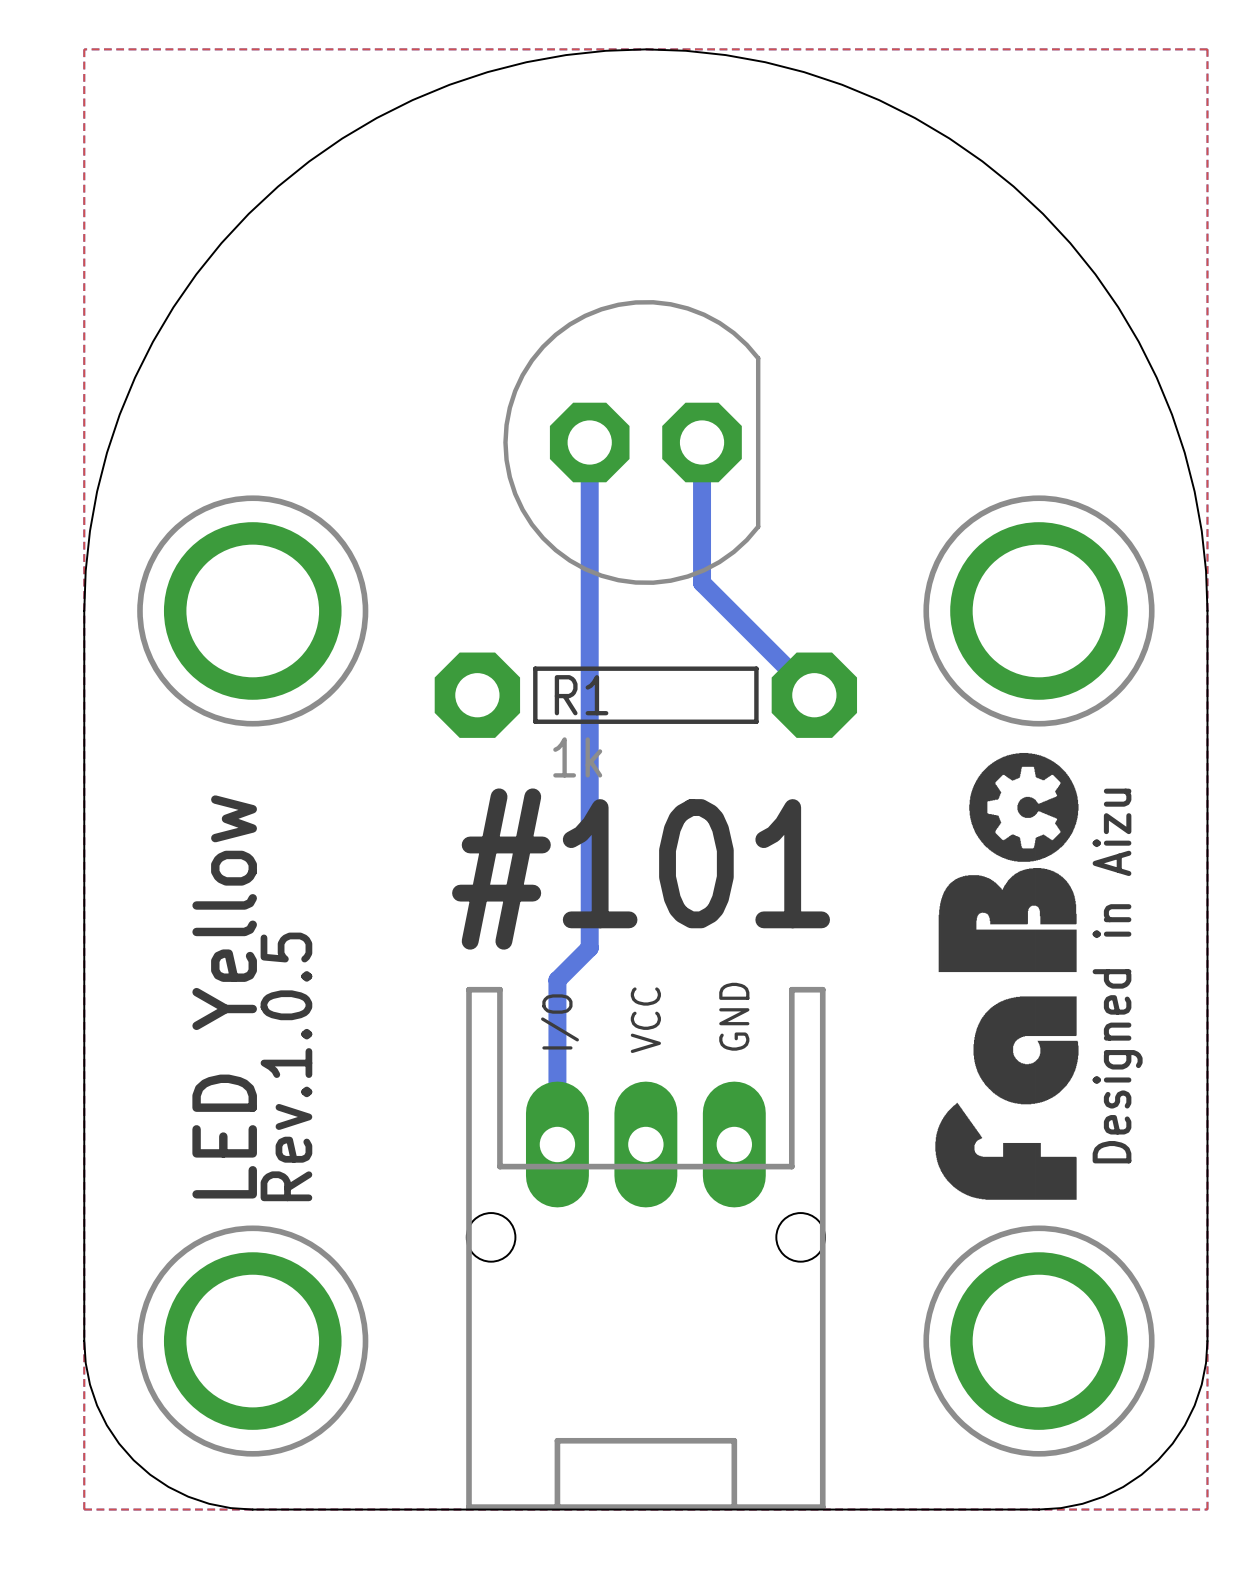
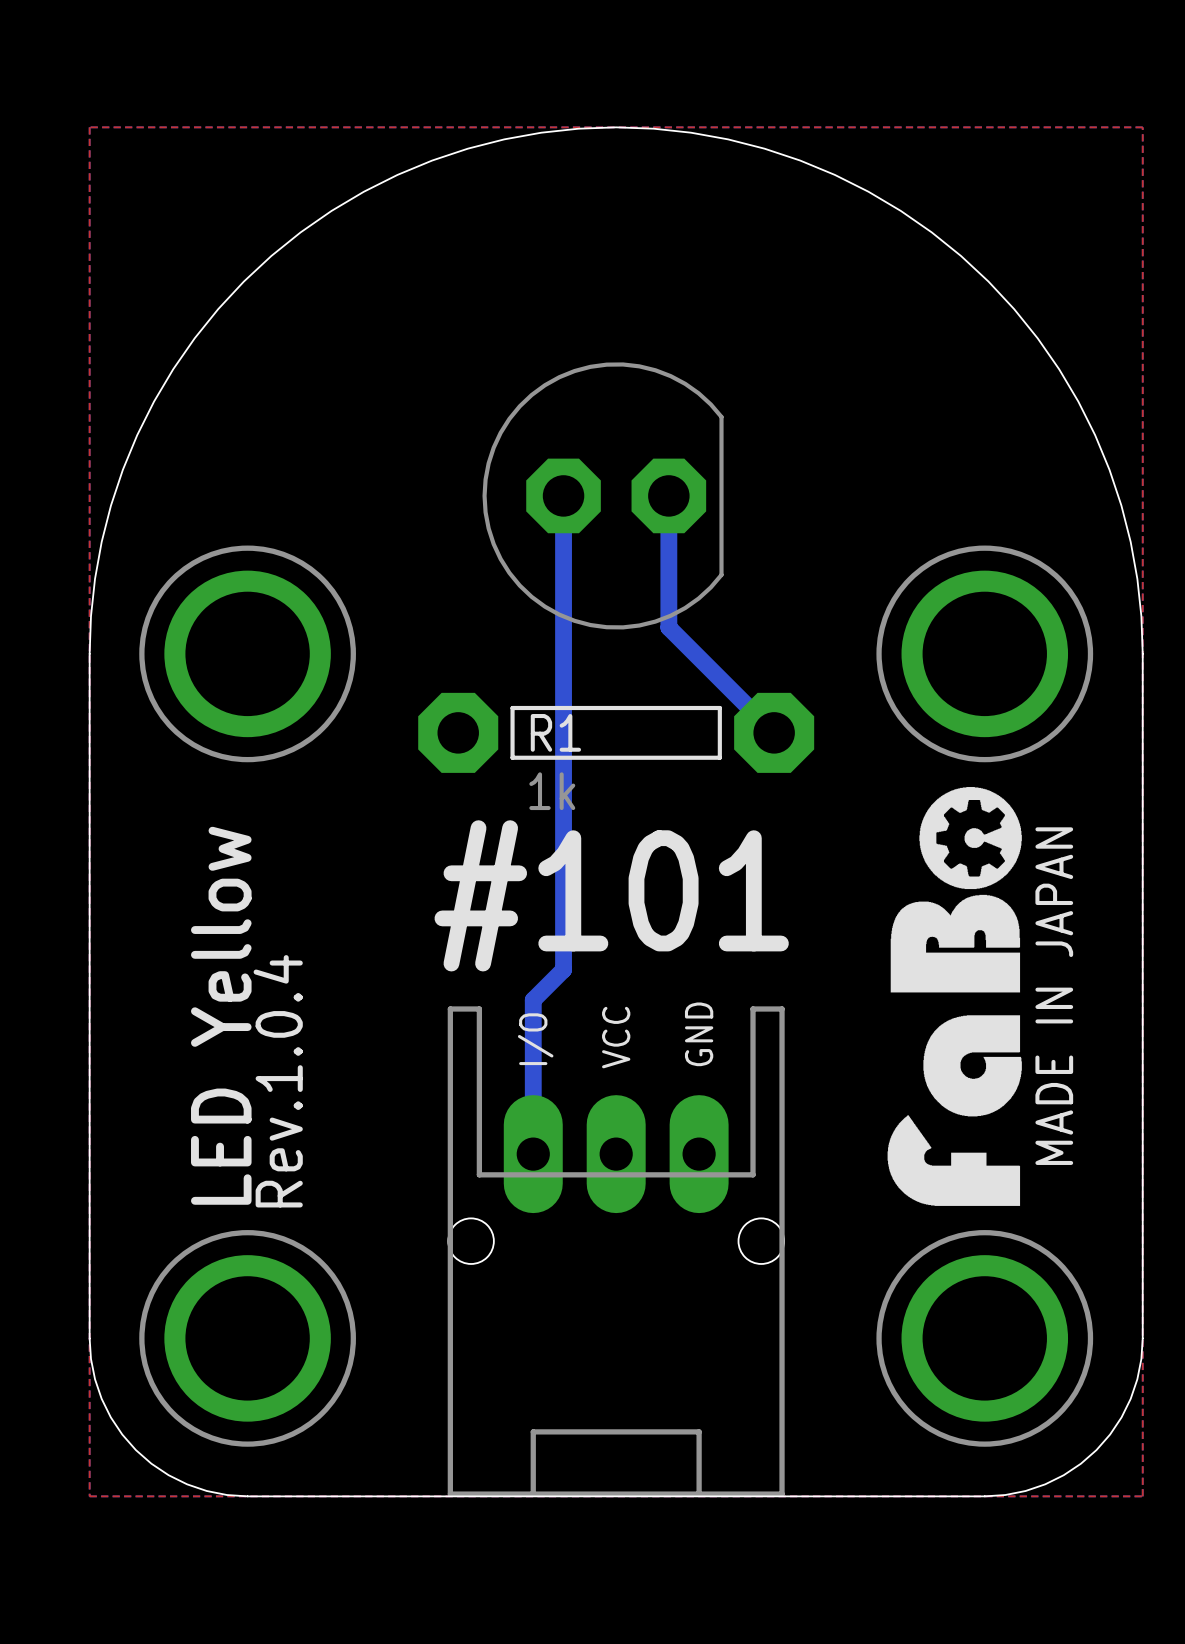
text: Designed in Aizu (1117, 976) -> MADE IN JAPAN (1054, 996)
text: Rev.1.0.5 (286, 1066) -> Rev.1.0.4 (278, 1081)

